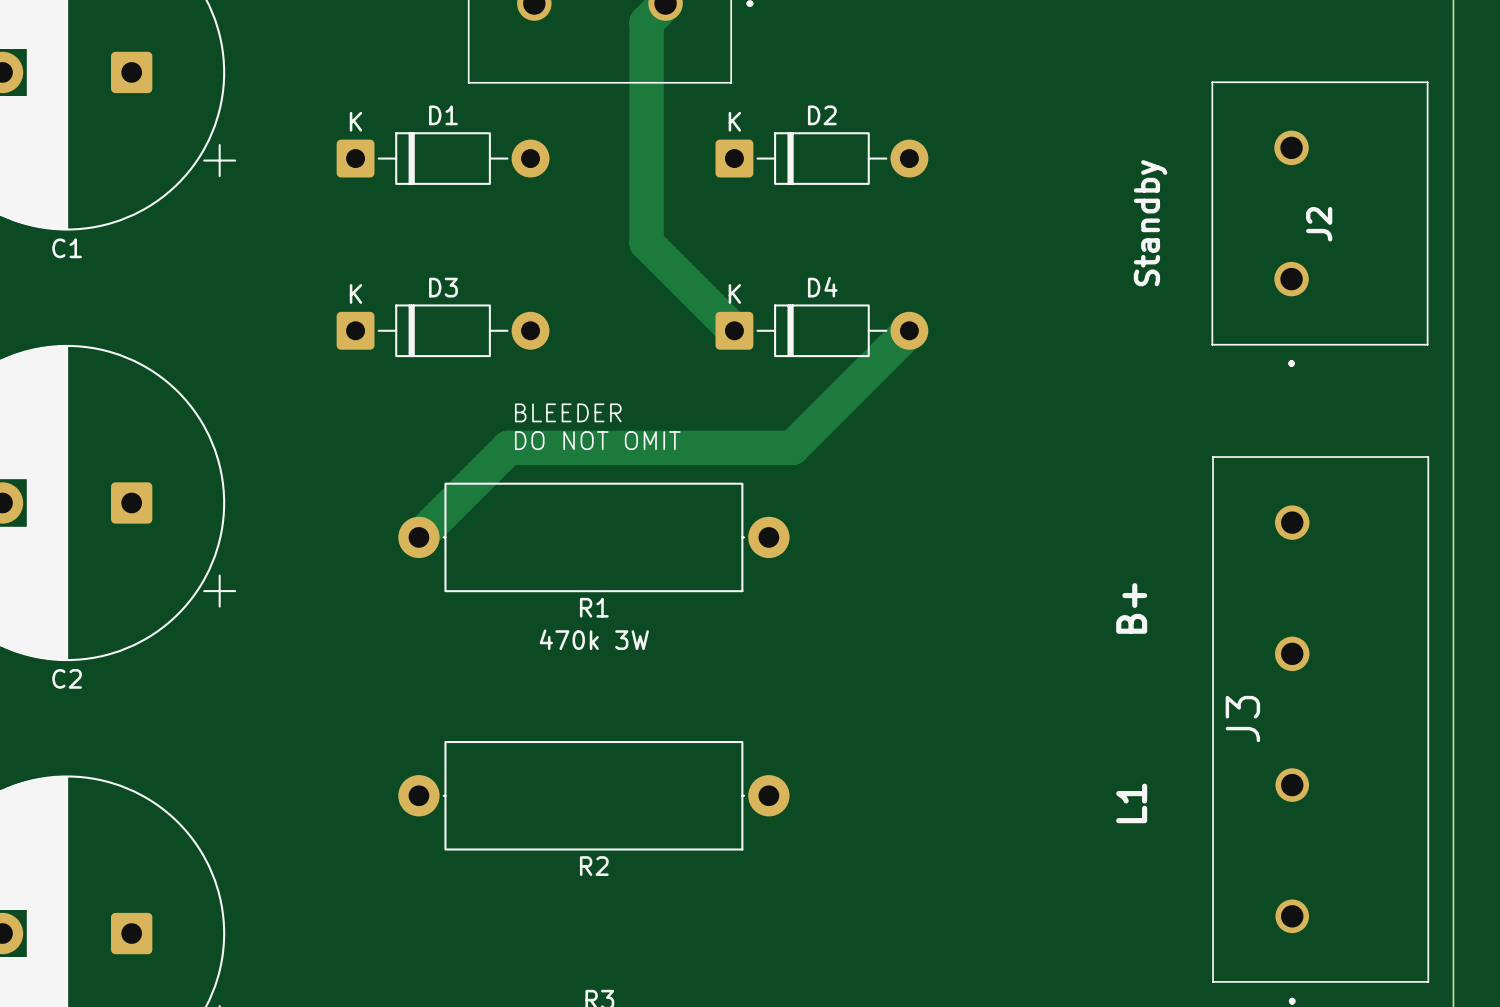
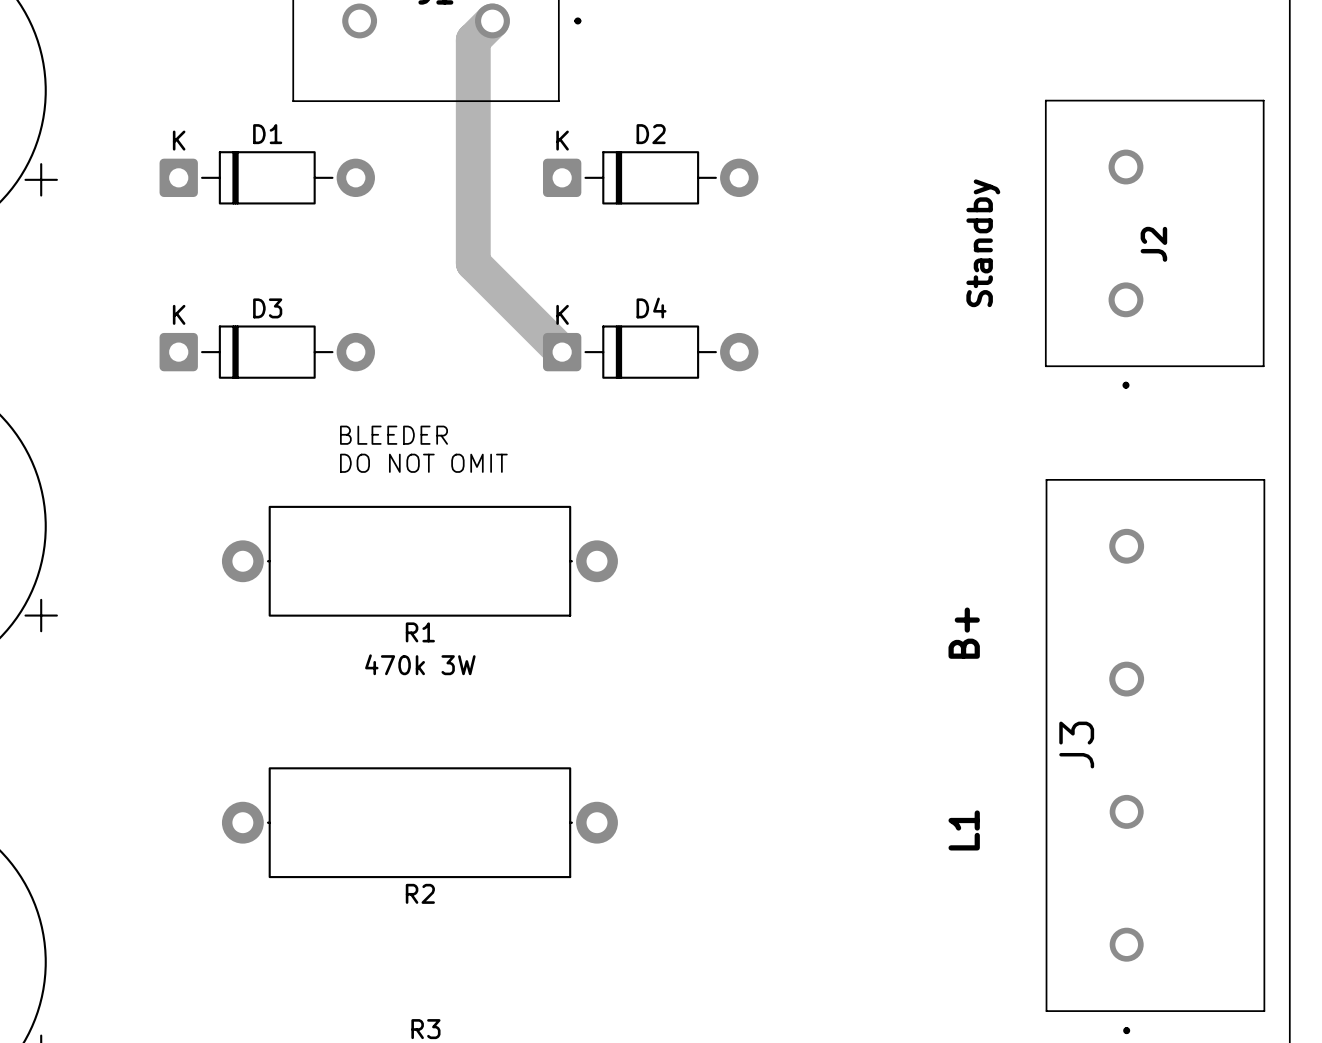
track: (909, 330) (792, 447) (508, 447) (418, 537) -> none

